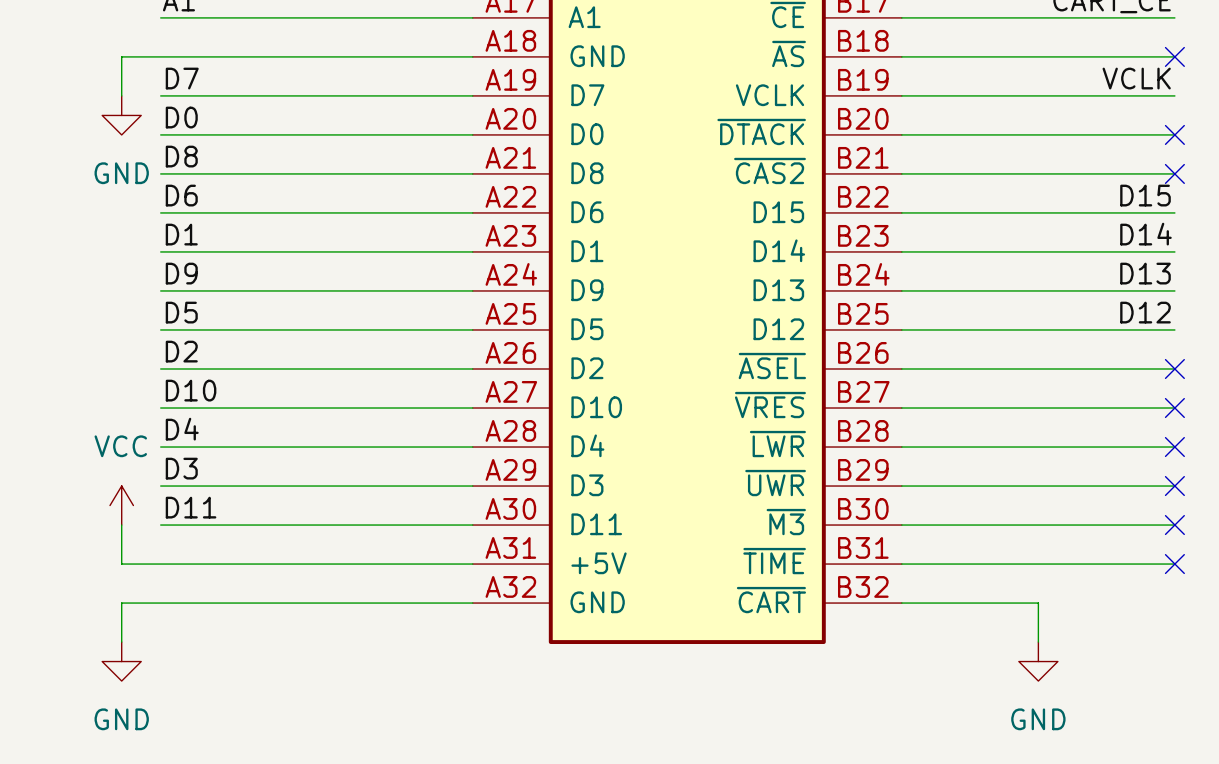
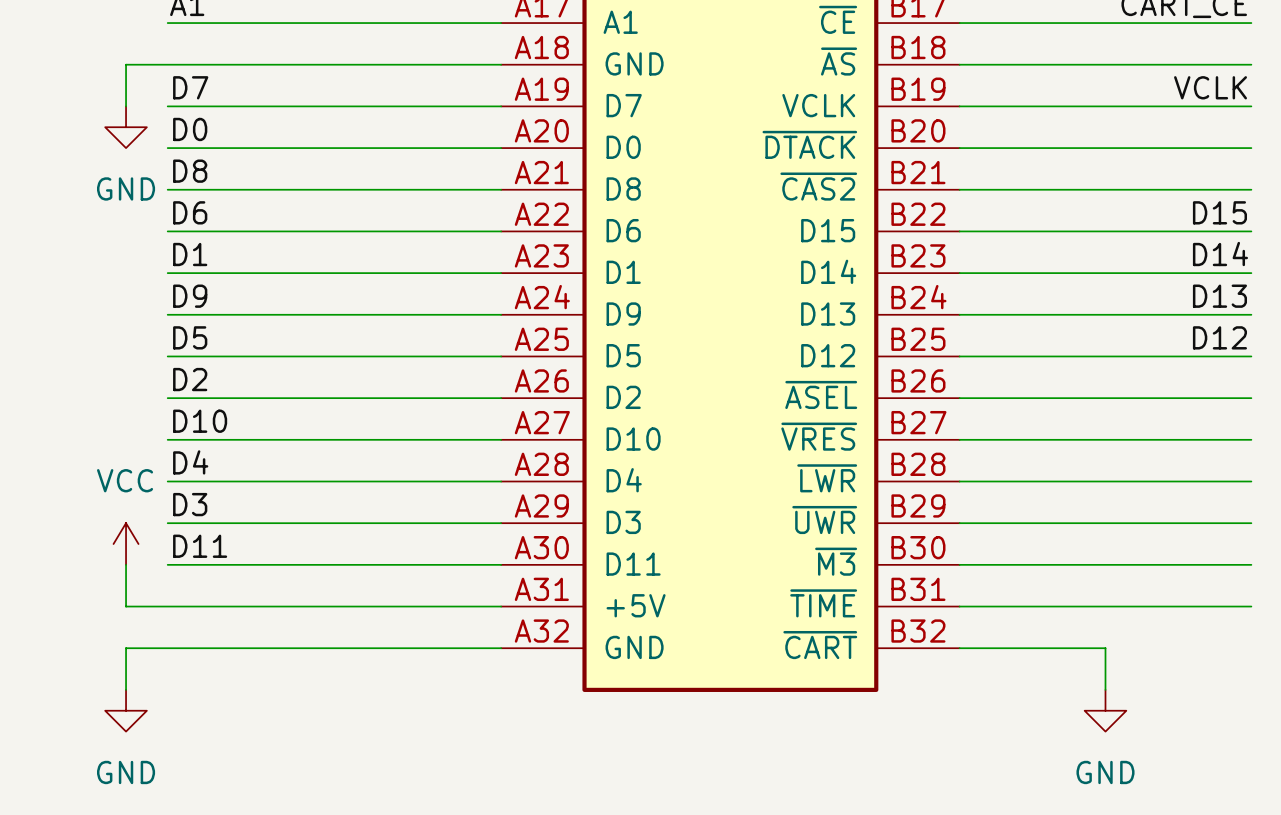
no-connect mark: (1174, 56) -> none
no-connect mark: (1174, 134) -> none
no-connect mark: (1174, 173) -> none
no-connect mark: (1174, 368) -> none
no-connect mark: (1174, 408) -> none
no-connect mark: (1174, 447) -> none
no-connect mark: (1174, 486) -> none
no-connect mark: (1174, 525) -> none
no-connect mark: (1174, 564) -> none

